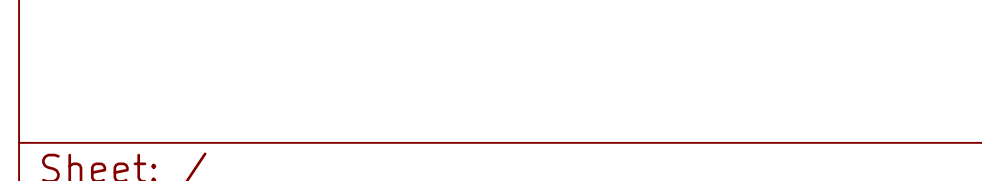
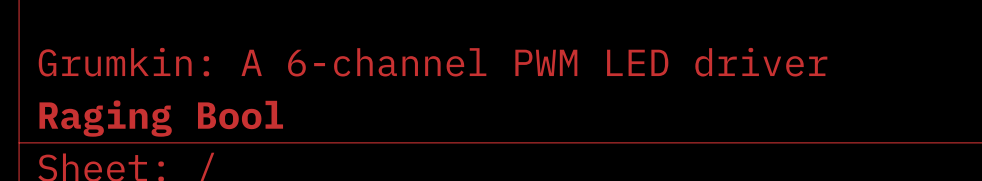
title block: none -> Grumkin: A 6-channel PWM LED driver (433, 62)
title block: none -> Raging Bool (161, 118)

